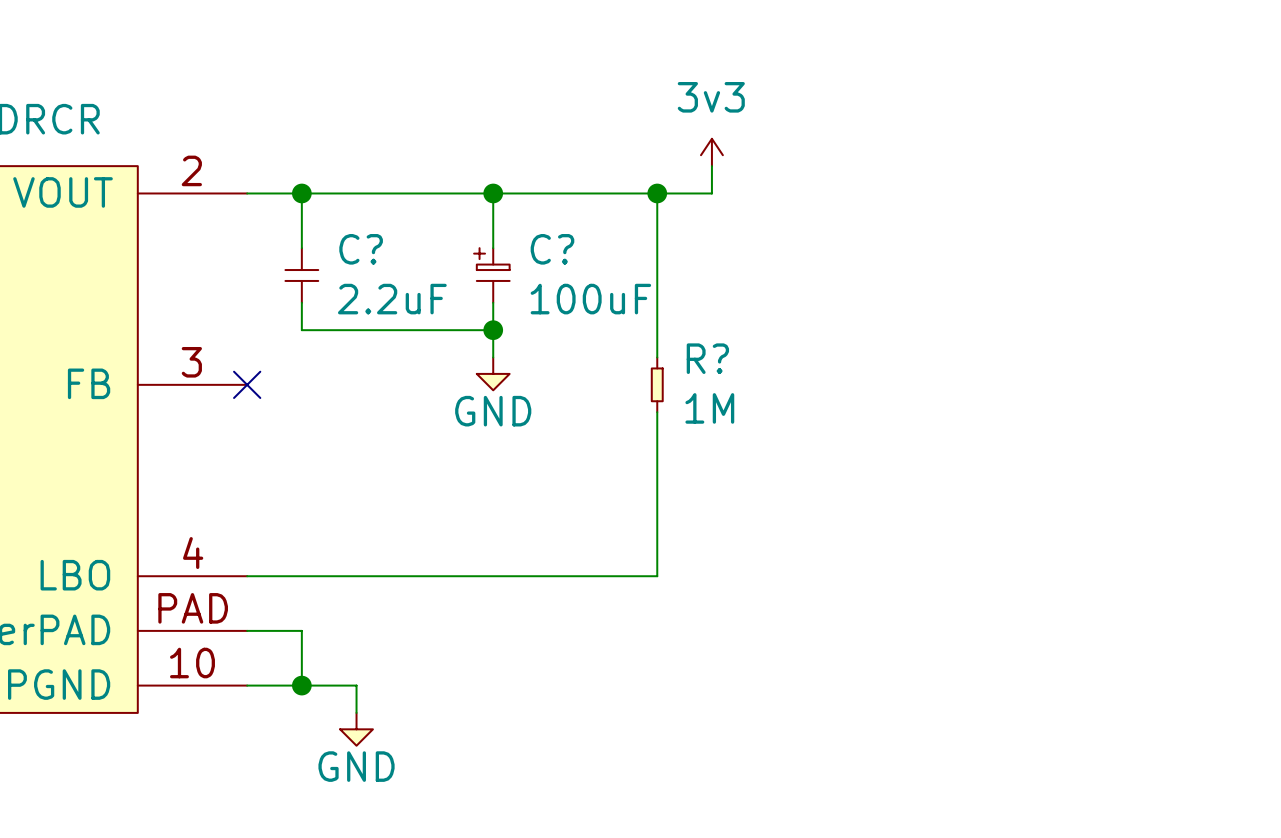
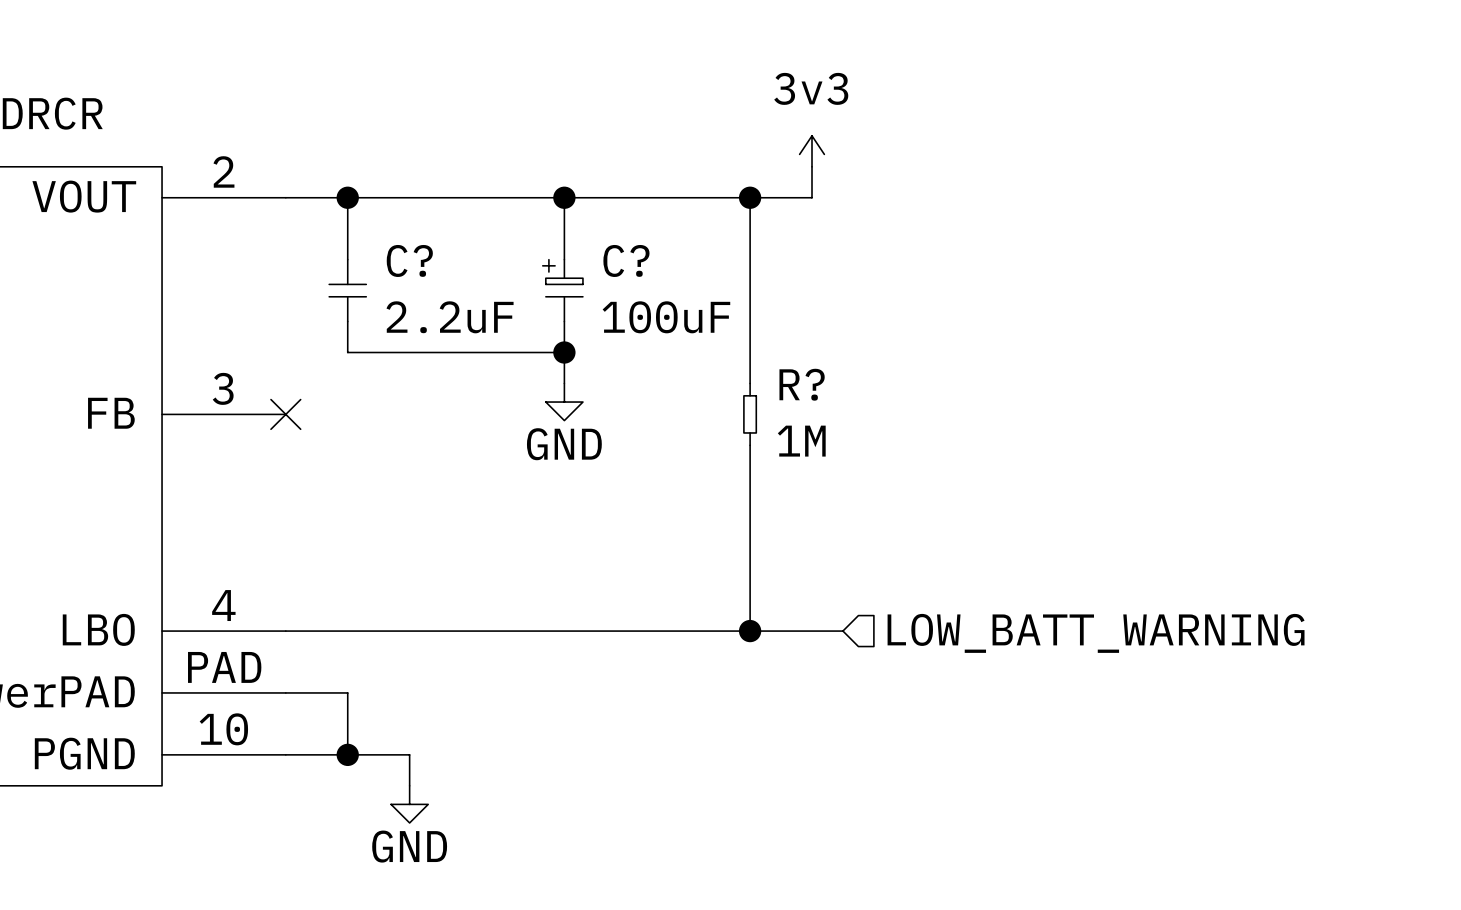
wire: none -> (750, 631) (842, 631)
junction: none -> (750, 631)
hierarchical label: none -> LOW_BATT_WARNING (1096, 633)

